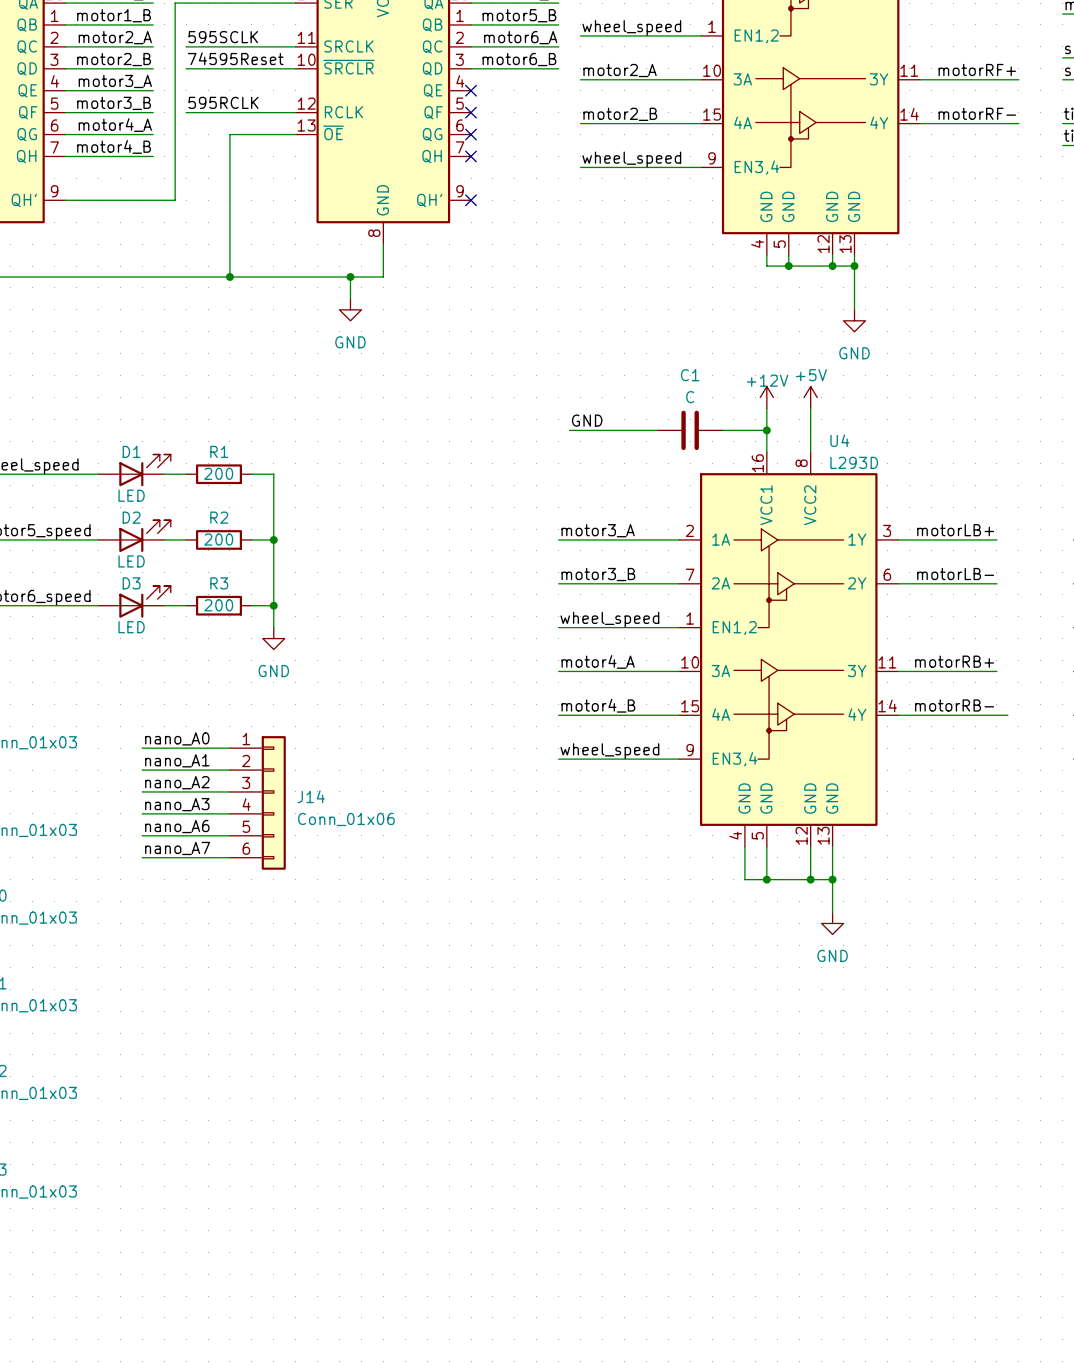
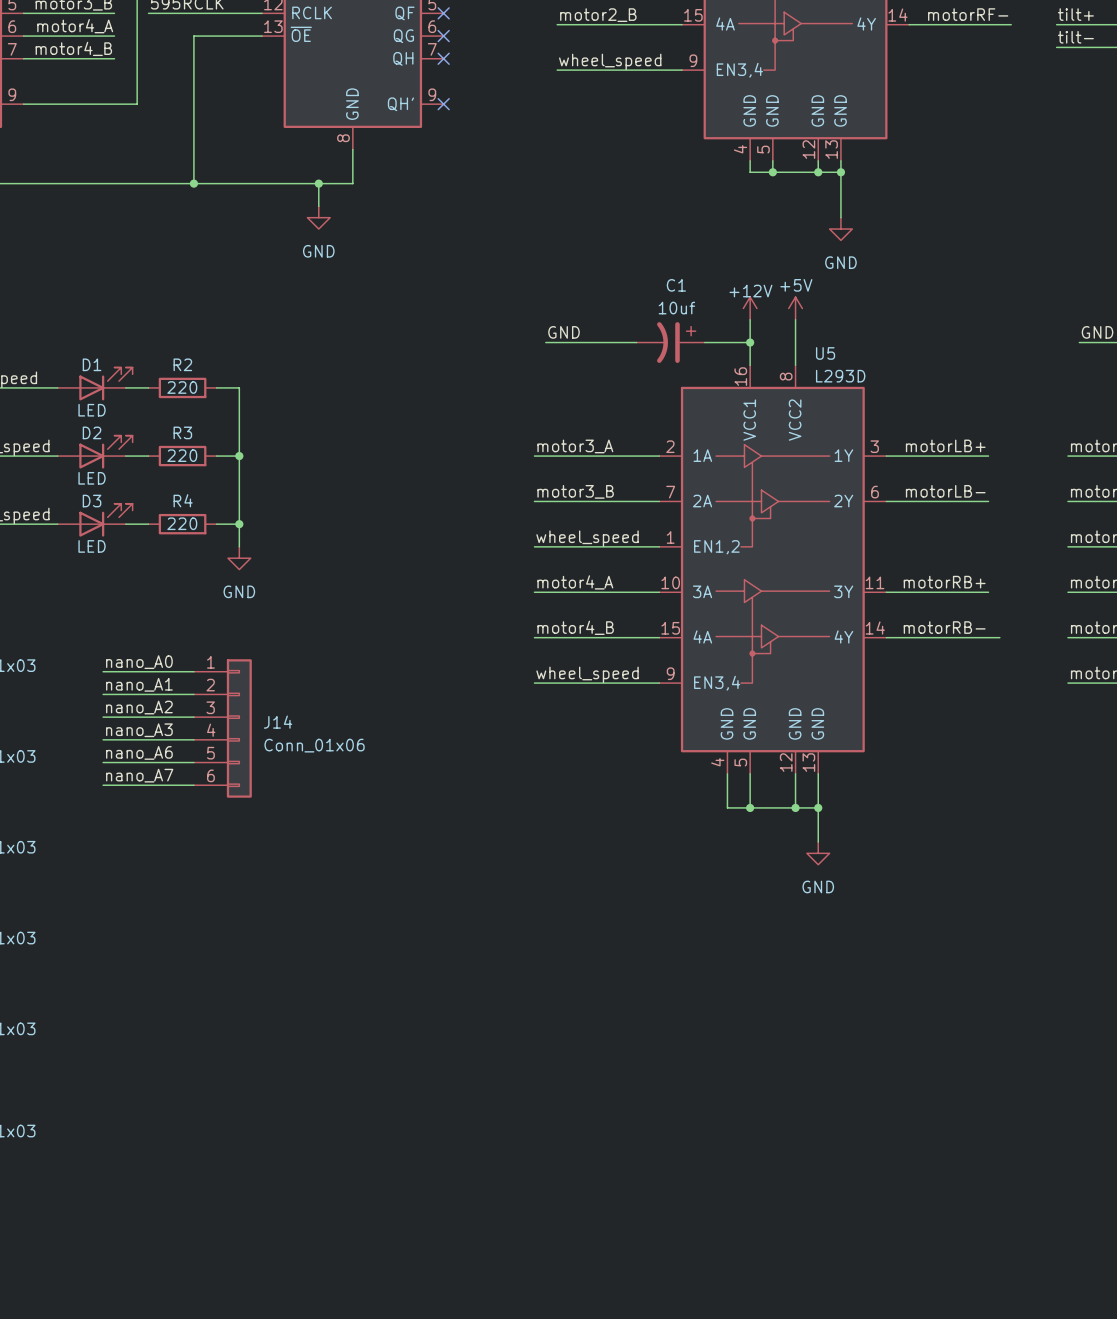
C1 value: C (690, 397) -> 10uf (676, 308)
C1 symbol: [657, 410, 724, 451] -> [636, 322, 705, 363]
U4 name: U4 (839, 440) -> U5 (825, 353)
R1 name: R1 (219, 451) -> R2 (182, 364)
R1 value: 200 (218, 473) -> 220 (182, 387)
R2 name: R2 (219, 517) -> R3 (182, 432)
R2 value: 200 (218, 539) -> 220 (182, 455)
R3 name: R3 (219, 583) -> R4 (183, 500)
R3 value: 200 (218, 605) -> 220 (182, 523)

